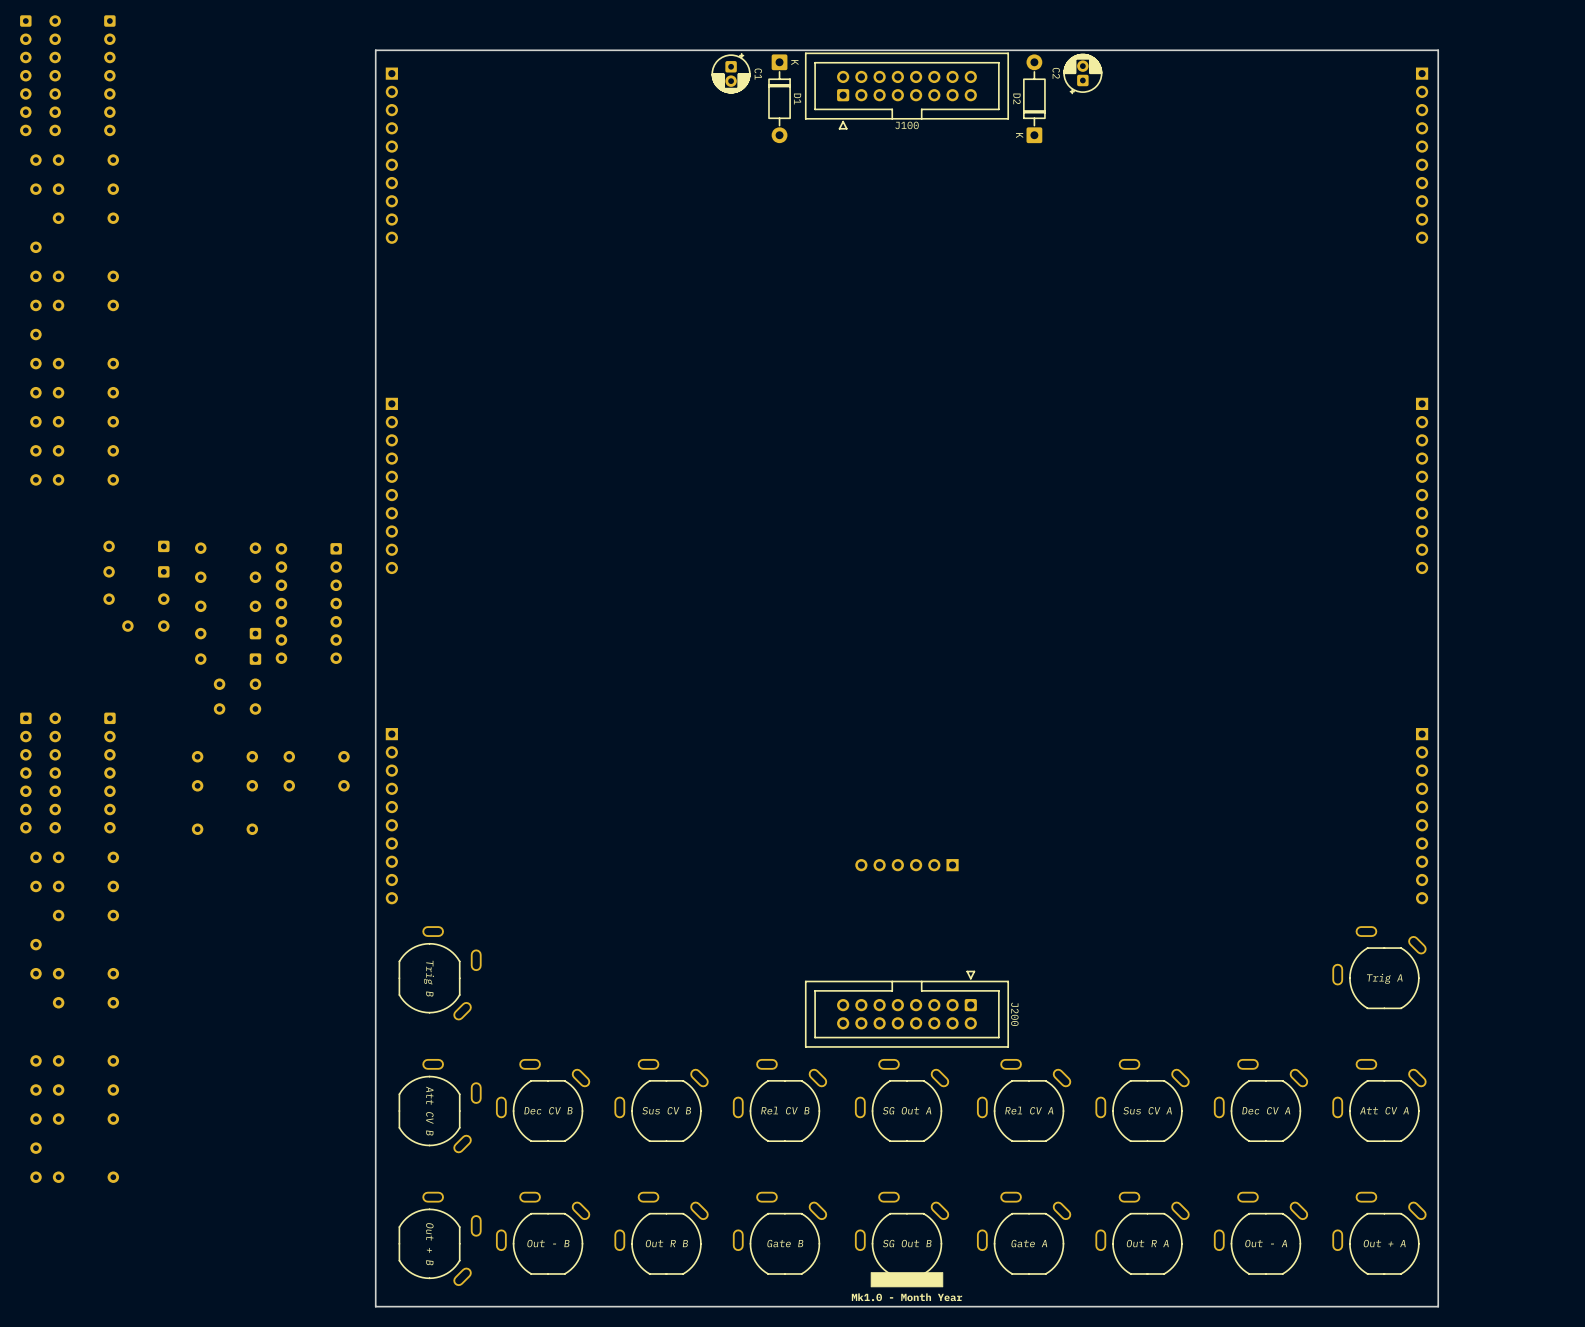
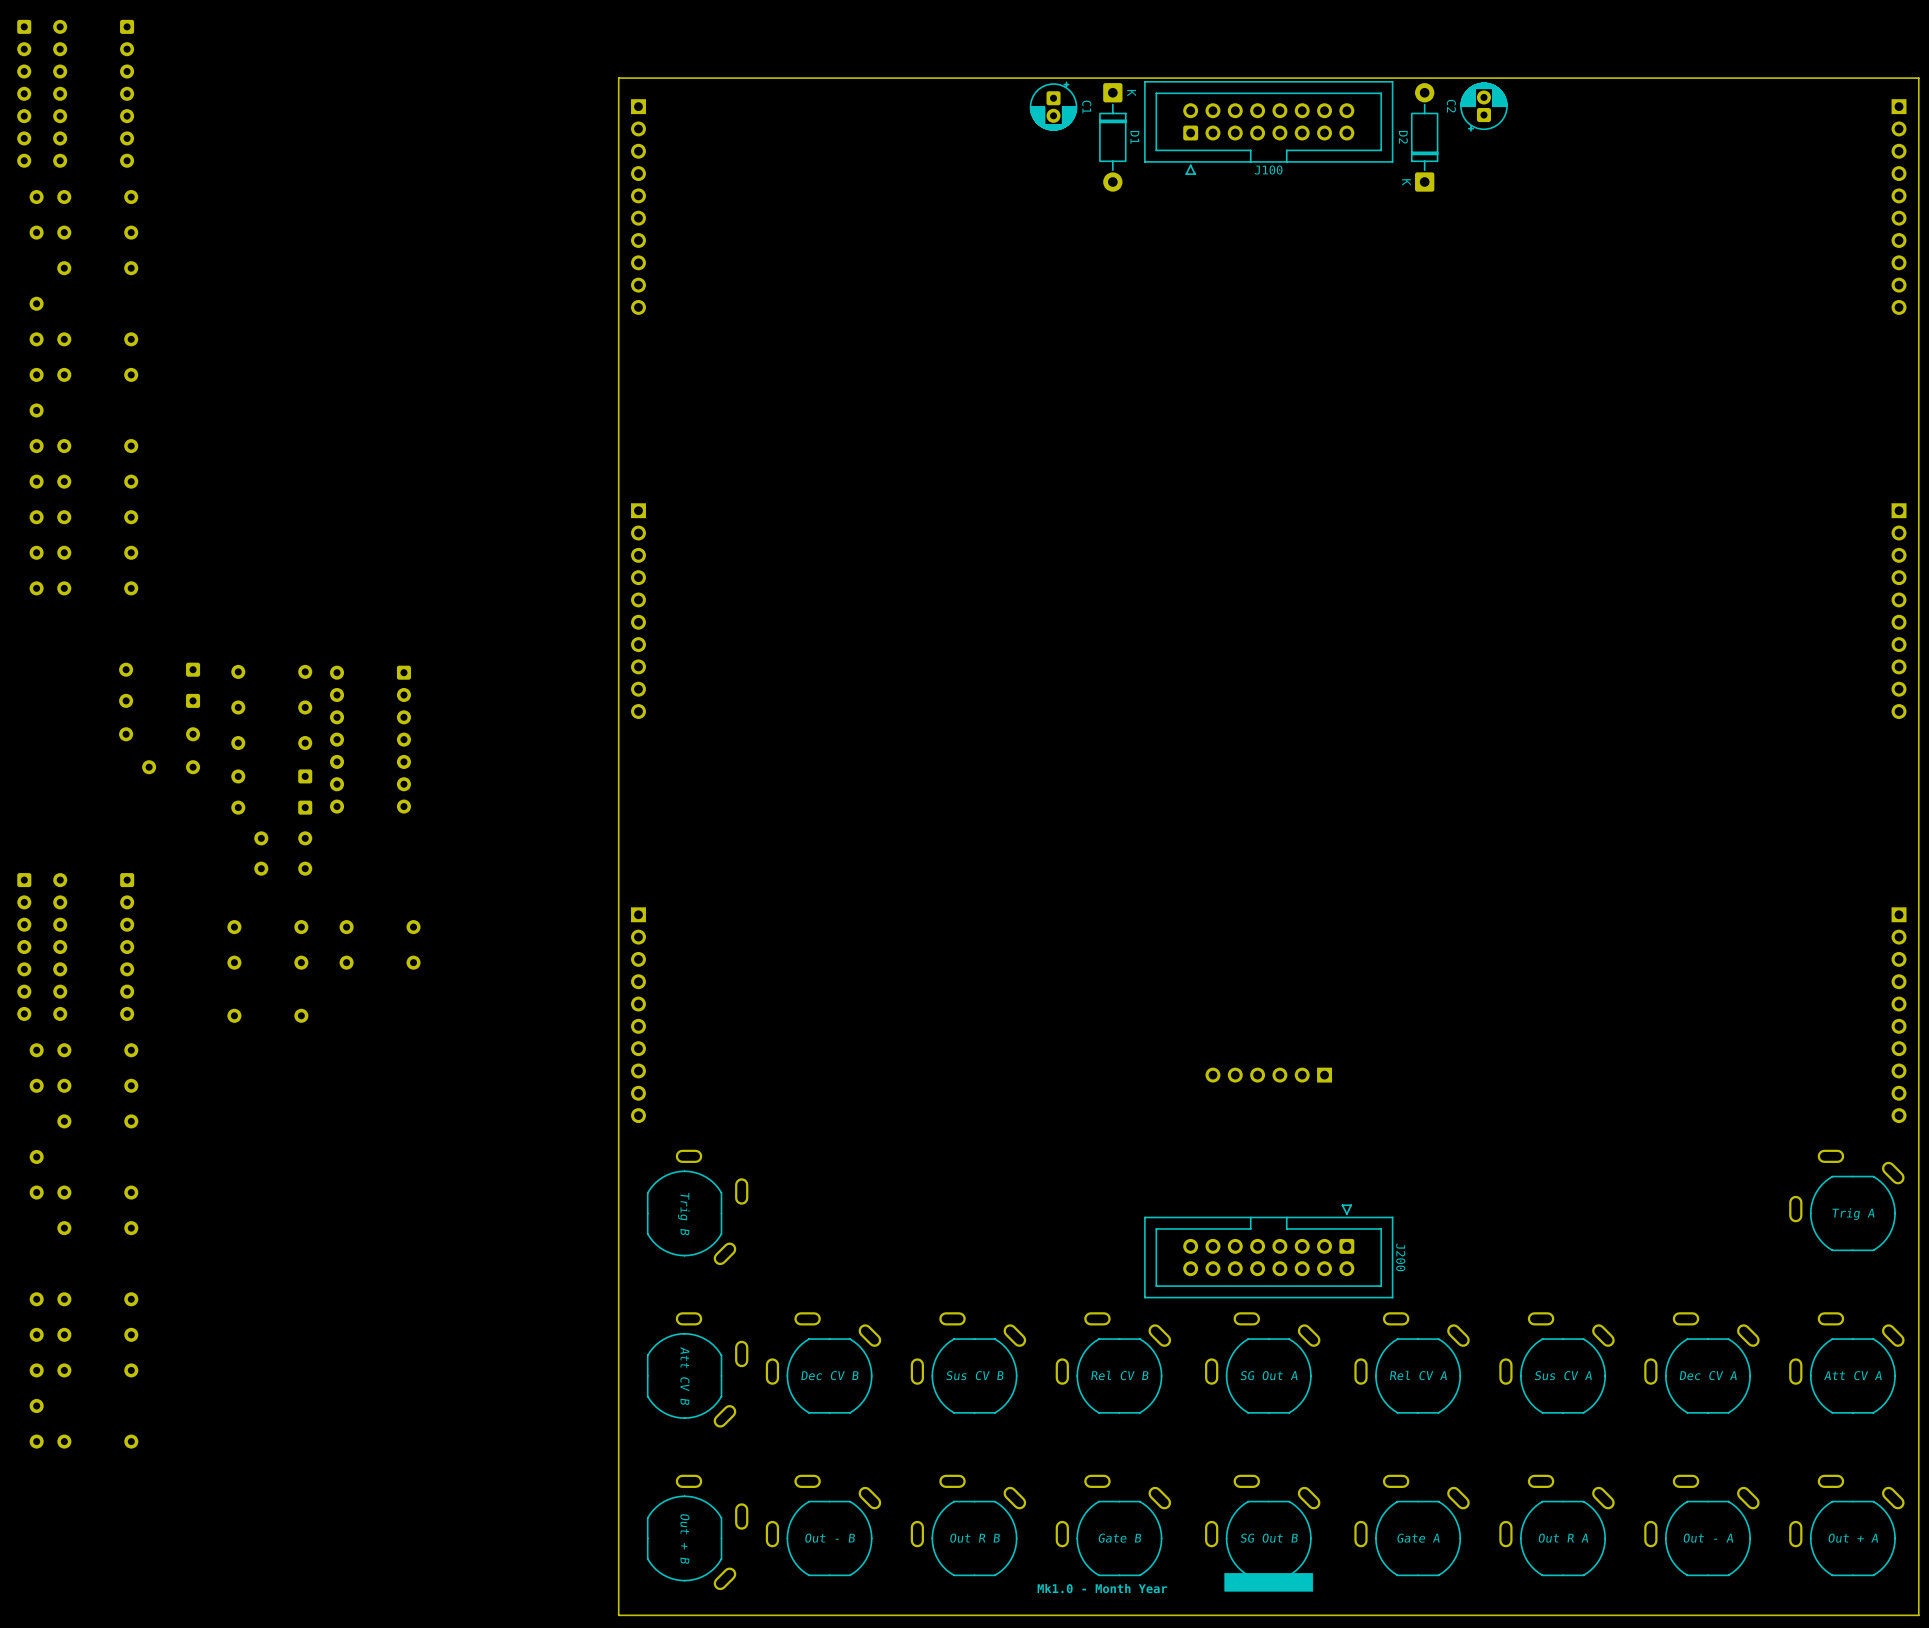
board edge: (1438, 50) (375, 50) (375, 1306) (1438, 1306) (1438, 50) -> (1918, 78) (618, 78) (618, 1615) (1918, 1615) (1918, 78)
C1 position: (731, 73) -> (1053, 106)
C2 position: (1082, 73) -> (1483, 107)
J100 position: (906, 91) -> (1268, 127)
D1 position: (779, 98) -> (1112, 137)
D2 position: (1034, 98) -> (1424, 137)
part position: (391, 155) -> (638, 207)
part position: (1422, 155) -> (1899, 207)
part position: (391, 485) -> (638, 611)
part position: (1422, 485) -> (1899, 611)
part position: (391, 816) -> (638, 1015)
part position: (1422, 816) -> (1899, 1015)
part position: (906, 865) -> (1268, 1075)
part position: (1379, 967) -> (1846, 1200)
part position: (440, 973) -> (697, 1207)
J200 position: (906, 1009) -> (1268, 1251)
part position: (543, 1100) -> (823, 1362)
part position: (661, 1100) -> (968, 1362)
part position: (780, 1100) -> (1113, 1362)
part position: (902, 1100) -> (1262, 1362)
part position: (1024, 1100) -> (1412, 1362)
part position: (1142, 1100) -> (1557, 1362)
part position: (1261, 1100) -> (1701, 1362)
part position: (1379, 1100) -> (1846, 1362)
part position: (440, 1106) -> (697, 1369)
part position: (543, 1233) -> (823, 1525)
part position: (661, 1233) -> (968, 1525)
part position: (780, 1233) -> (1113, 1525)
part position: (902, 1233) -> (1262, 1525)
part position: (1024, 1233) -> (1412, 1525)
part position: (1142, 1233) -> (1557, 1525)
part position: (1261, 1233) -> (1701, 1525)
part position: (1379, 1233) -> (1846, 1525)
part position: (440, 1238) -> (697, 1532)
drawing position: (906, 1279) -> (1268, 1582)

